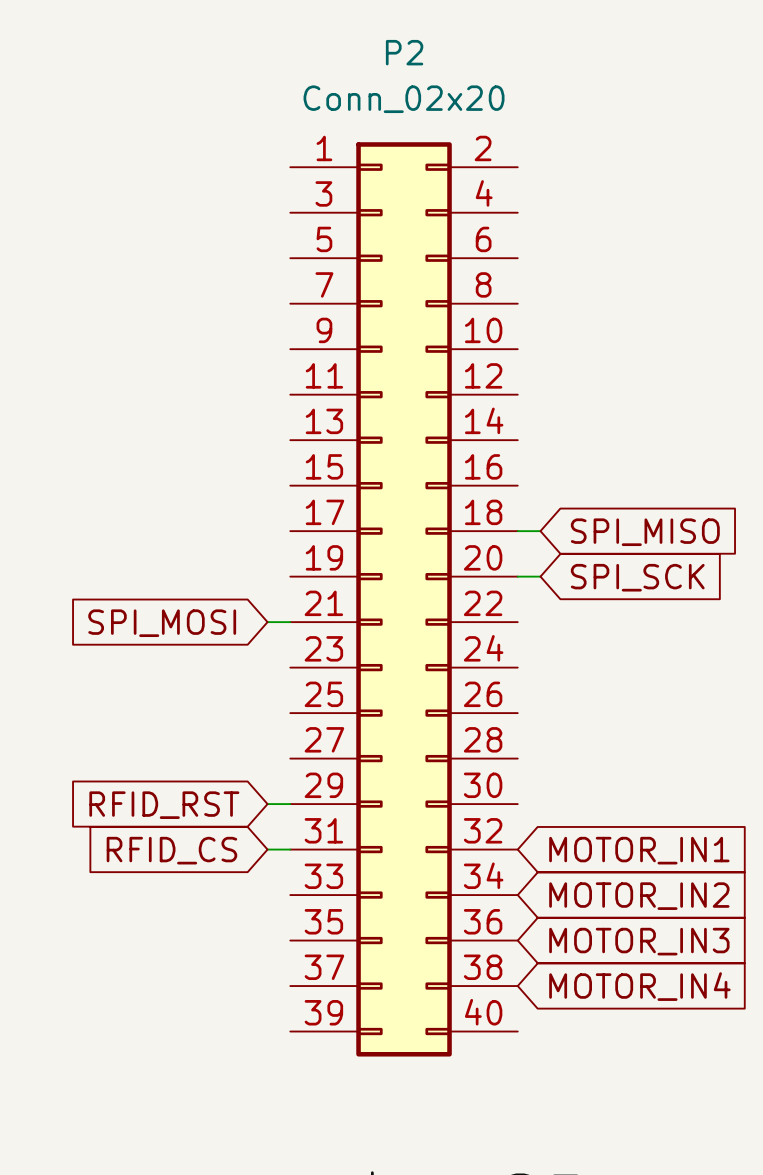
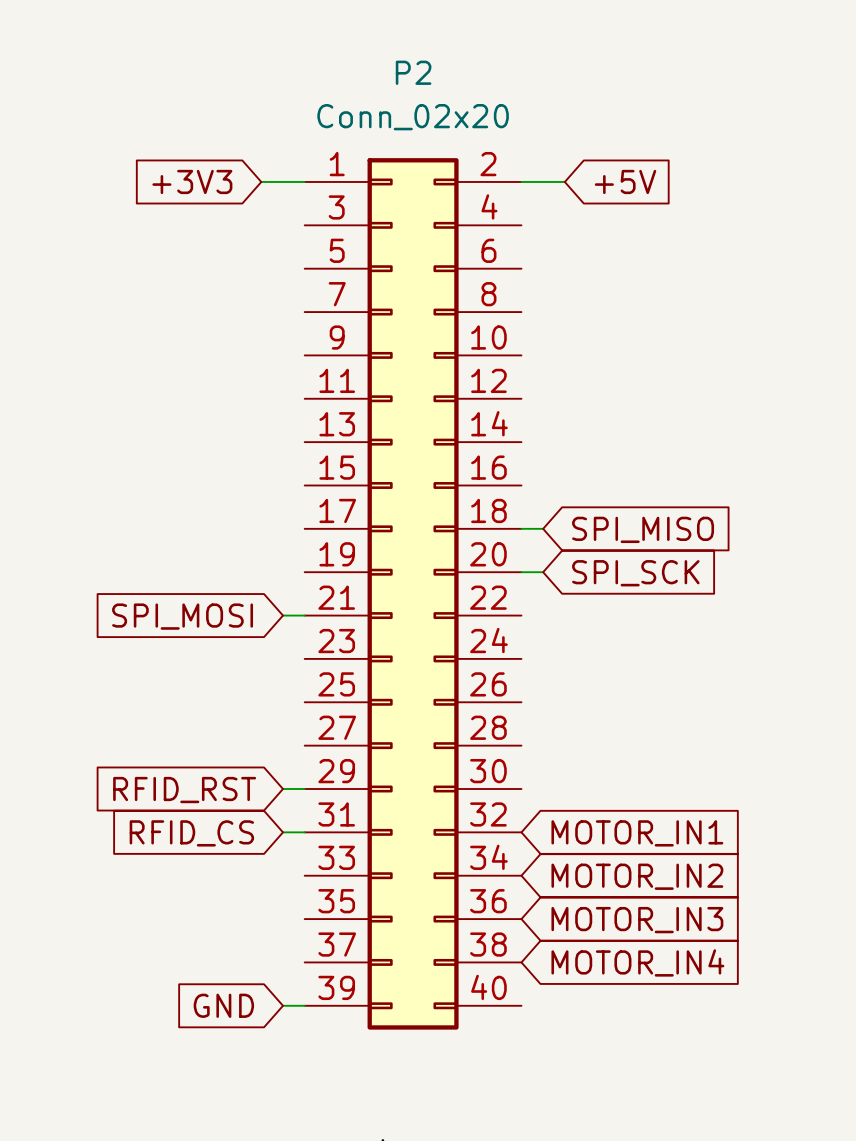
global label: none -> +3V3 (192, 181)
wire: none -> (261, 181) (304, 181)
wire: none -> (521, 181) (564, 181)
global label: none -> +5V (625, 181)
global label: none -> GND (223, 1005)
wire: none -> (283, 1005) (304, 1005)

